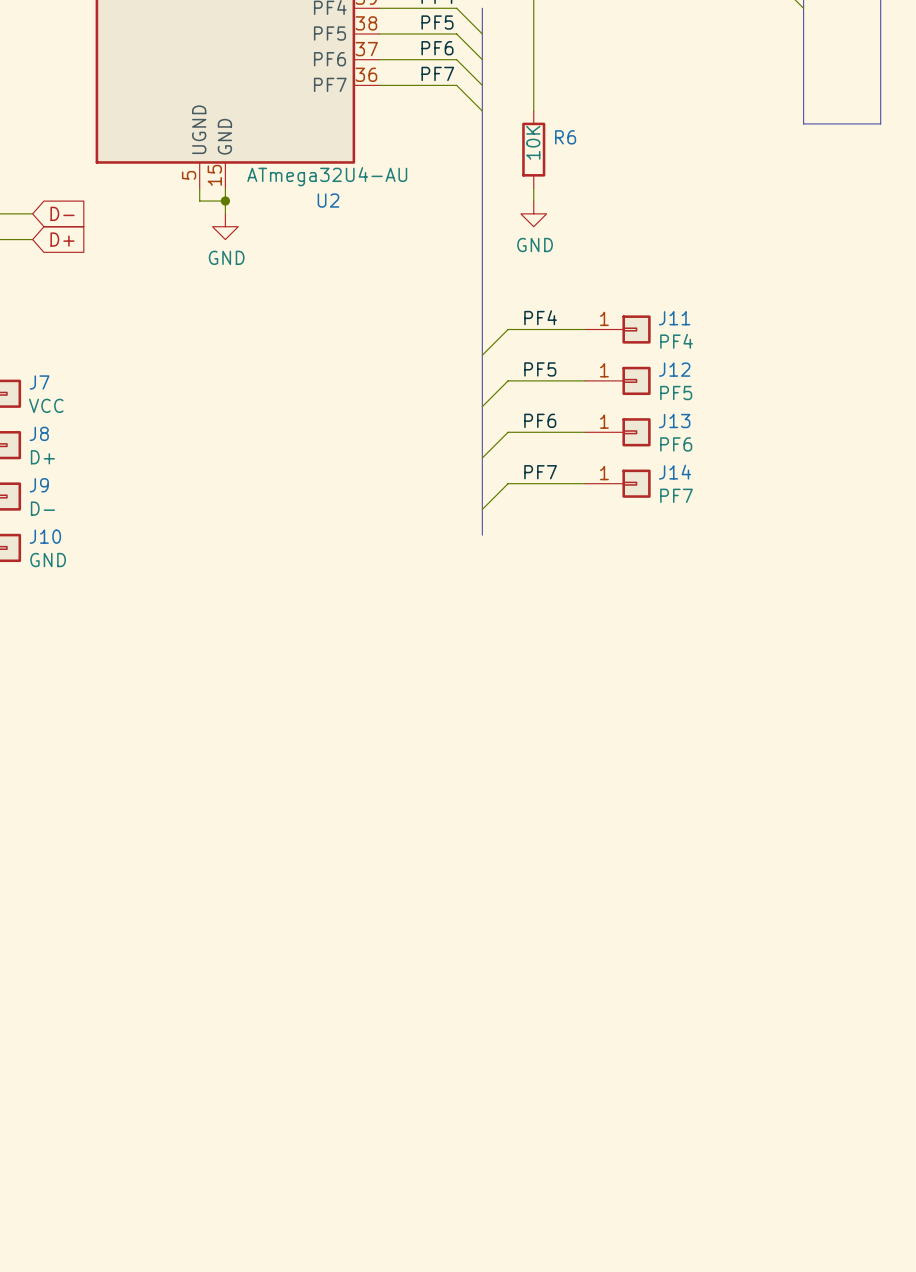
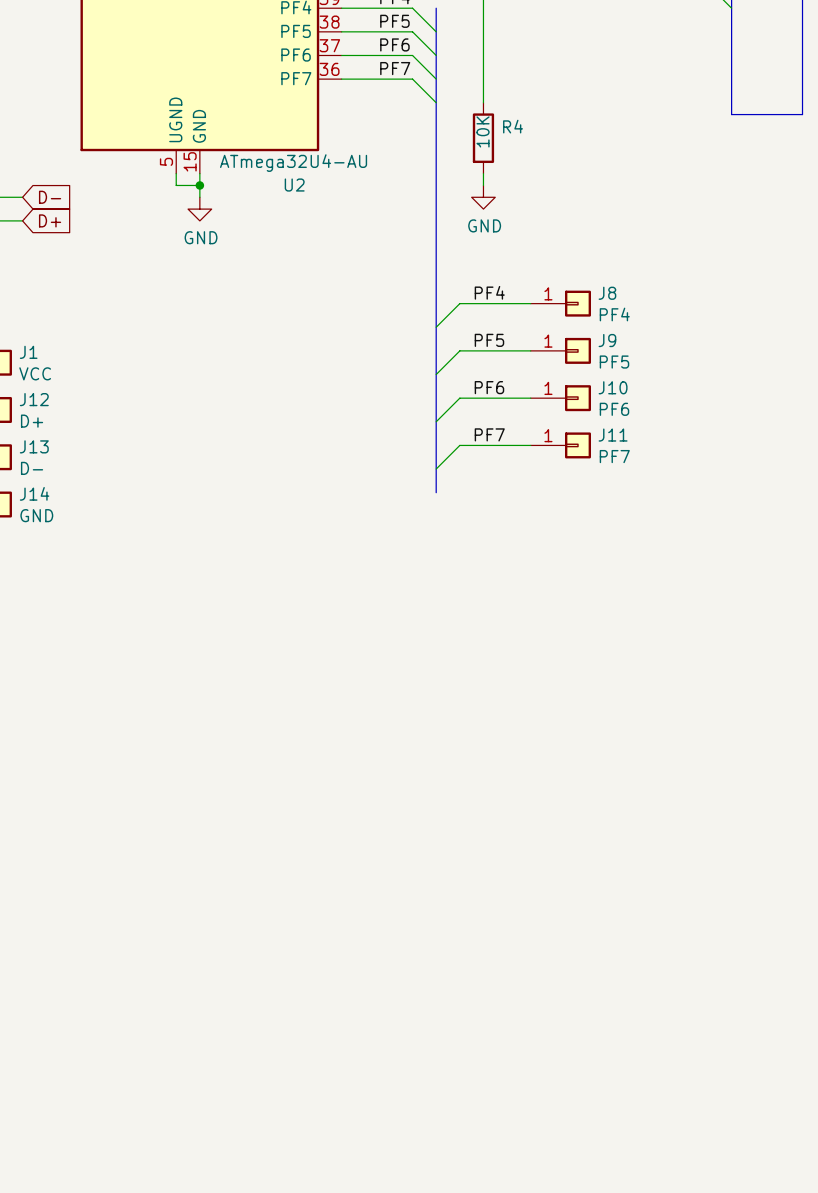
R6 name: R6 (565, 137) -> R4 (513, 126)
J11 name: J11 (674, 318) -> J8 (607, 293)
J12 name: J12 (674, 369) -> J9 (607, 340)
J7 name: J7 (39, 382) -> J1 (28, 352)
J13 name: J13 (674, 421) -> J10 (613, 387)
J8 name: J8 (39, 433) -> J12 (34, 399)
J14 name: J14 (674, 472) -> J11 (613, 435)
J9 name: J9 (39, 485) -> J13 (34, 446)
J10 name: J10 (45, 536) -> J14 (34, 493)

